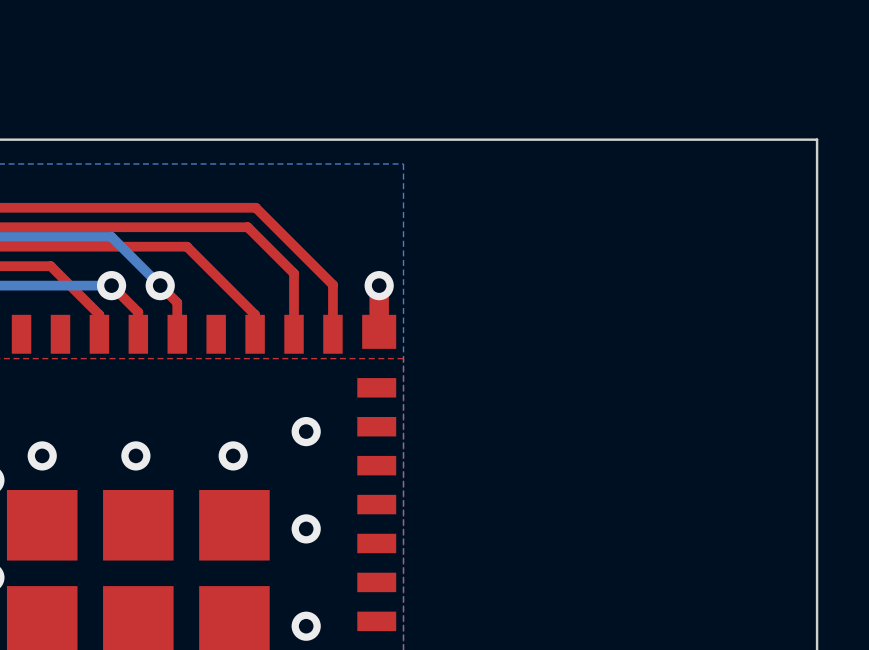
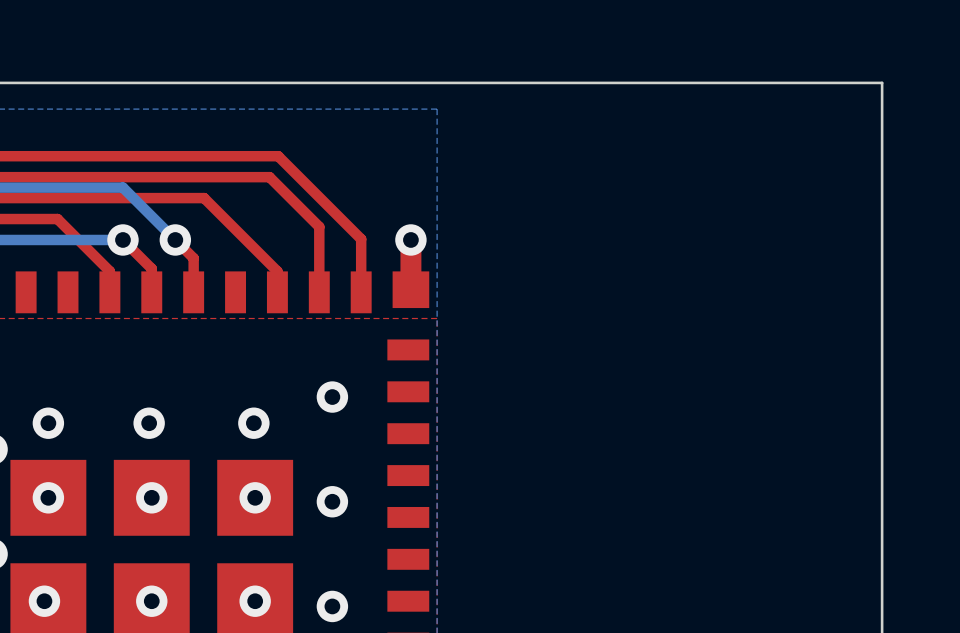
via: none -> (48, 497)
via: none -> (151, 497)
via: none -> (255, 497)
via: none -> (44, 601)
via: none -> (151, 601)
via: none -> (255, 601)

